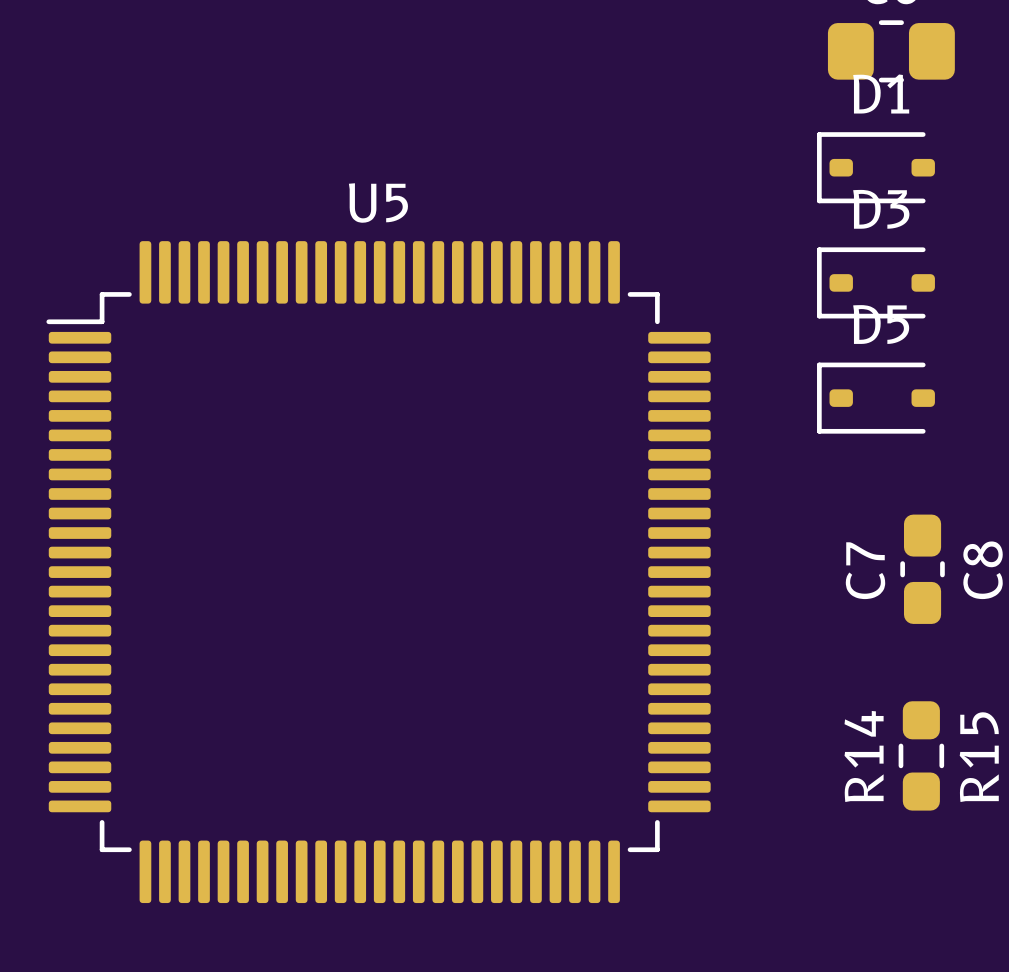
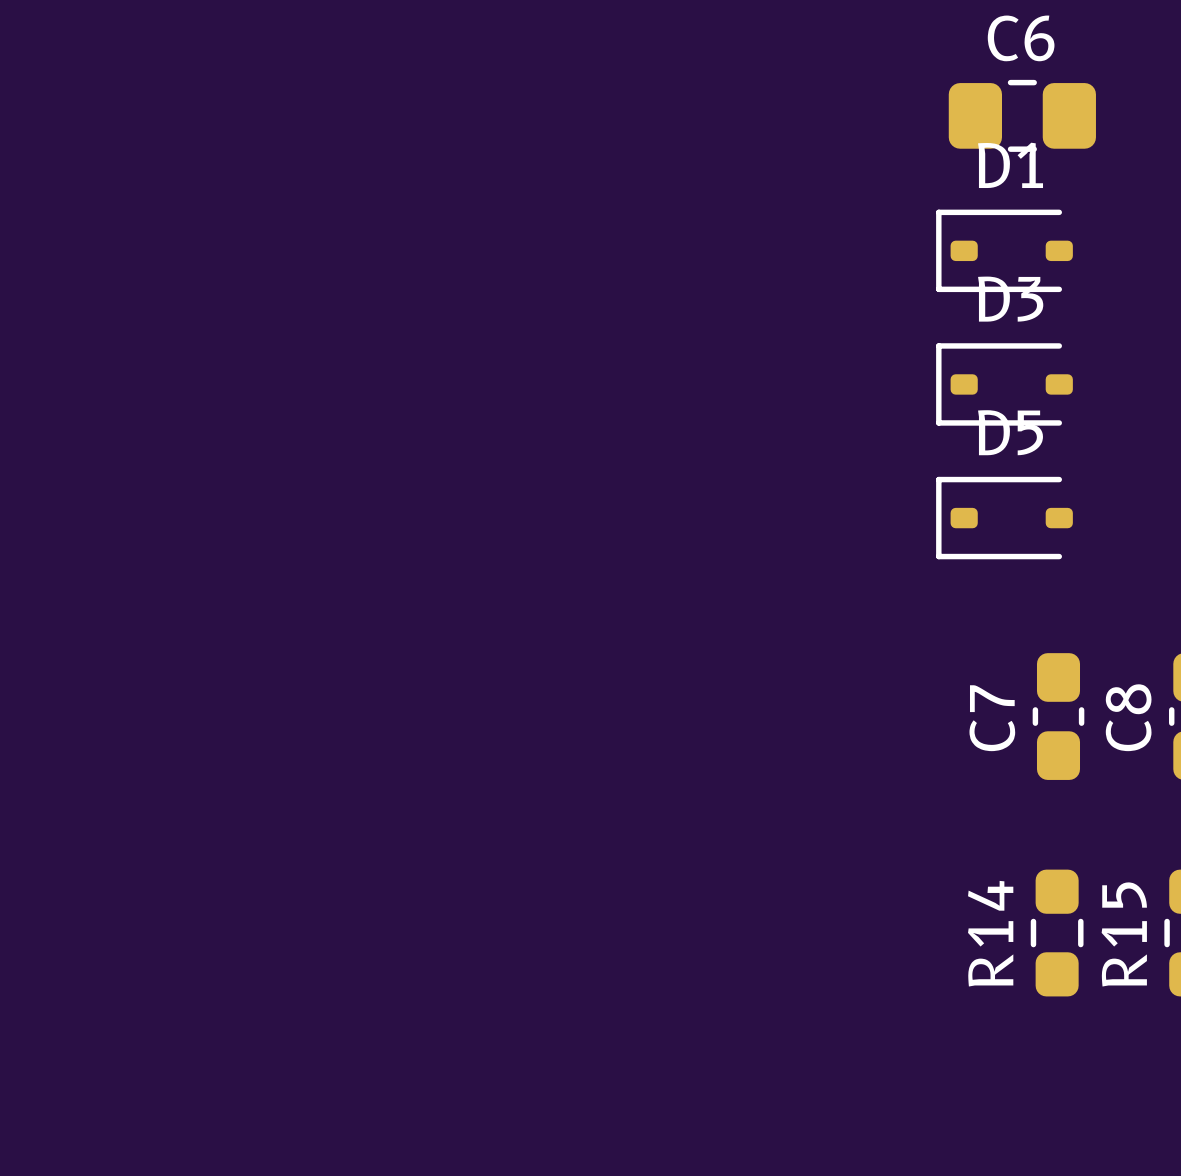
U5: (378, 572) -> none

